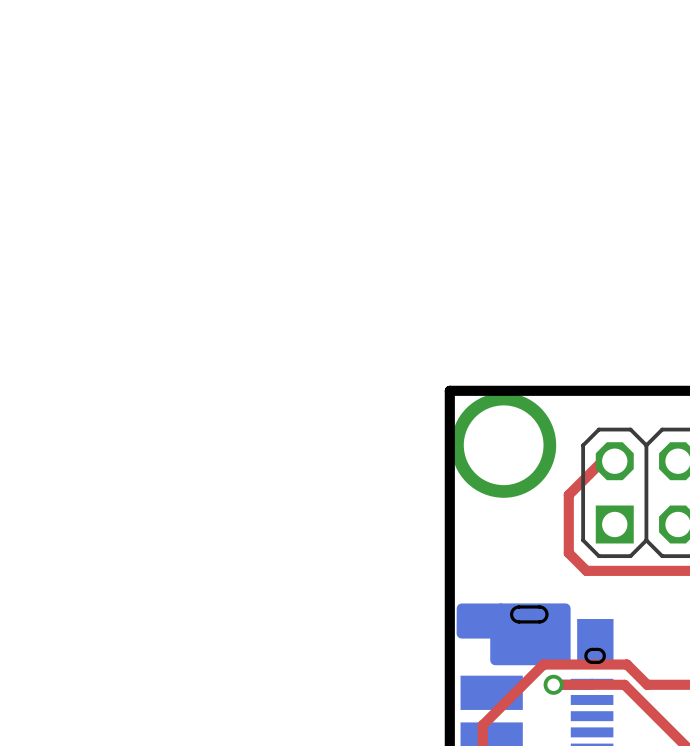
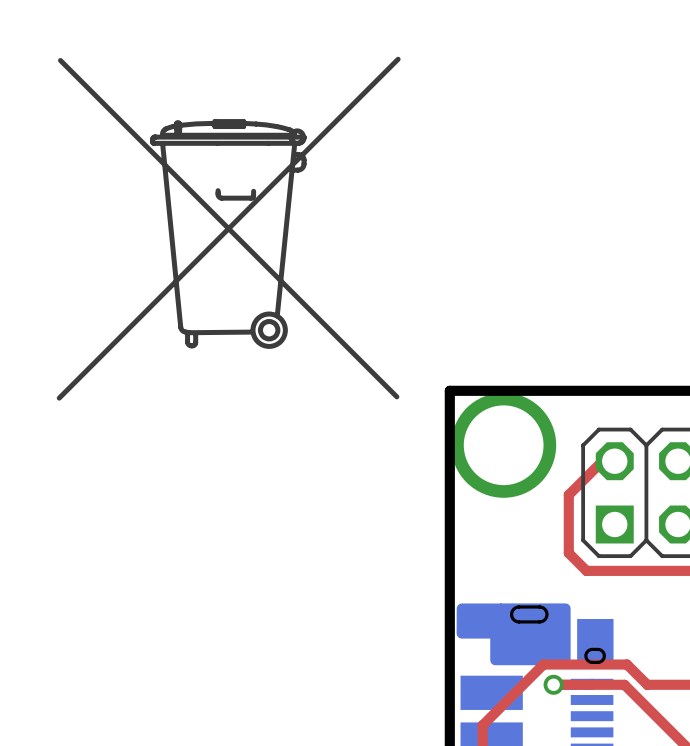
drawing: none -> [56, 56, 401, 401]

